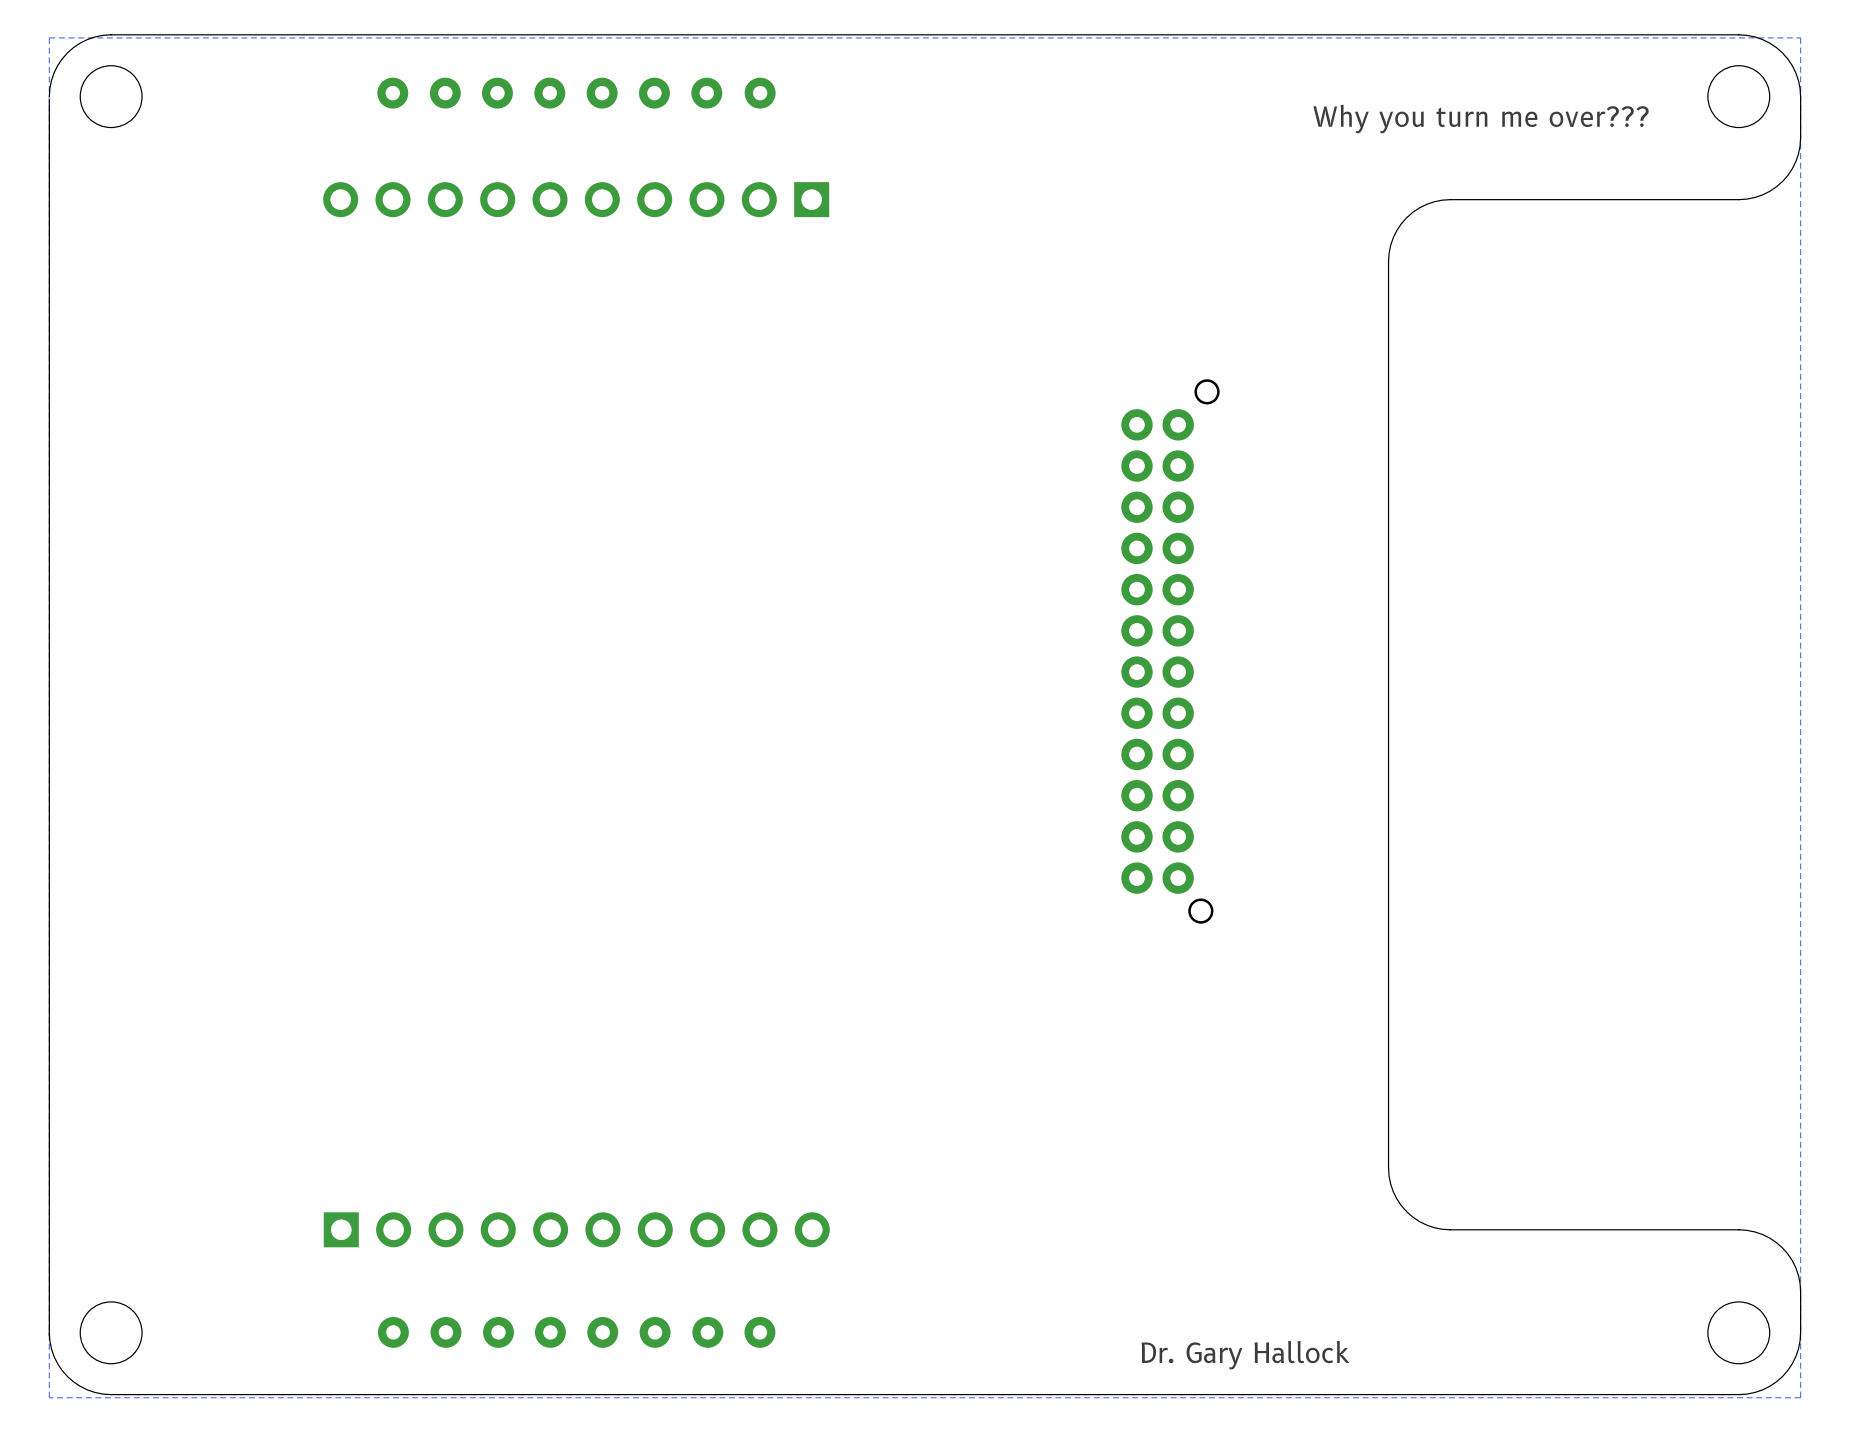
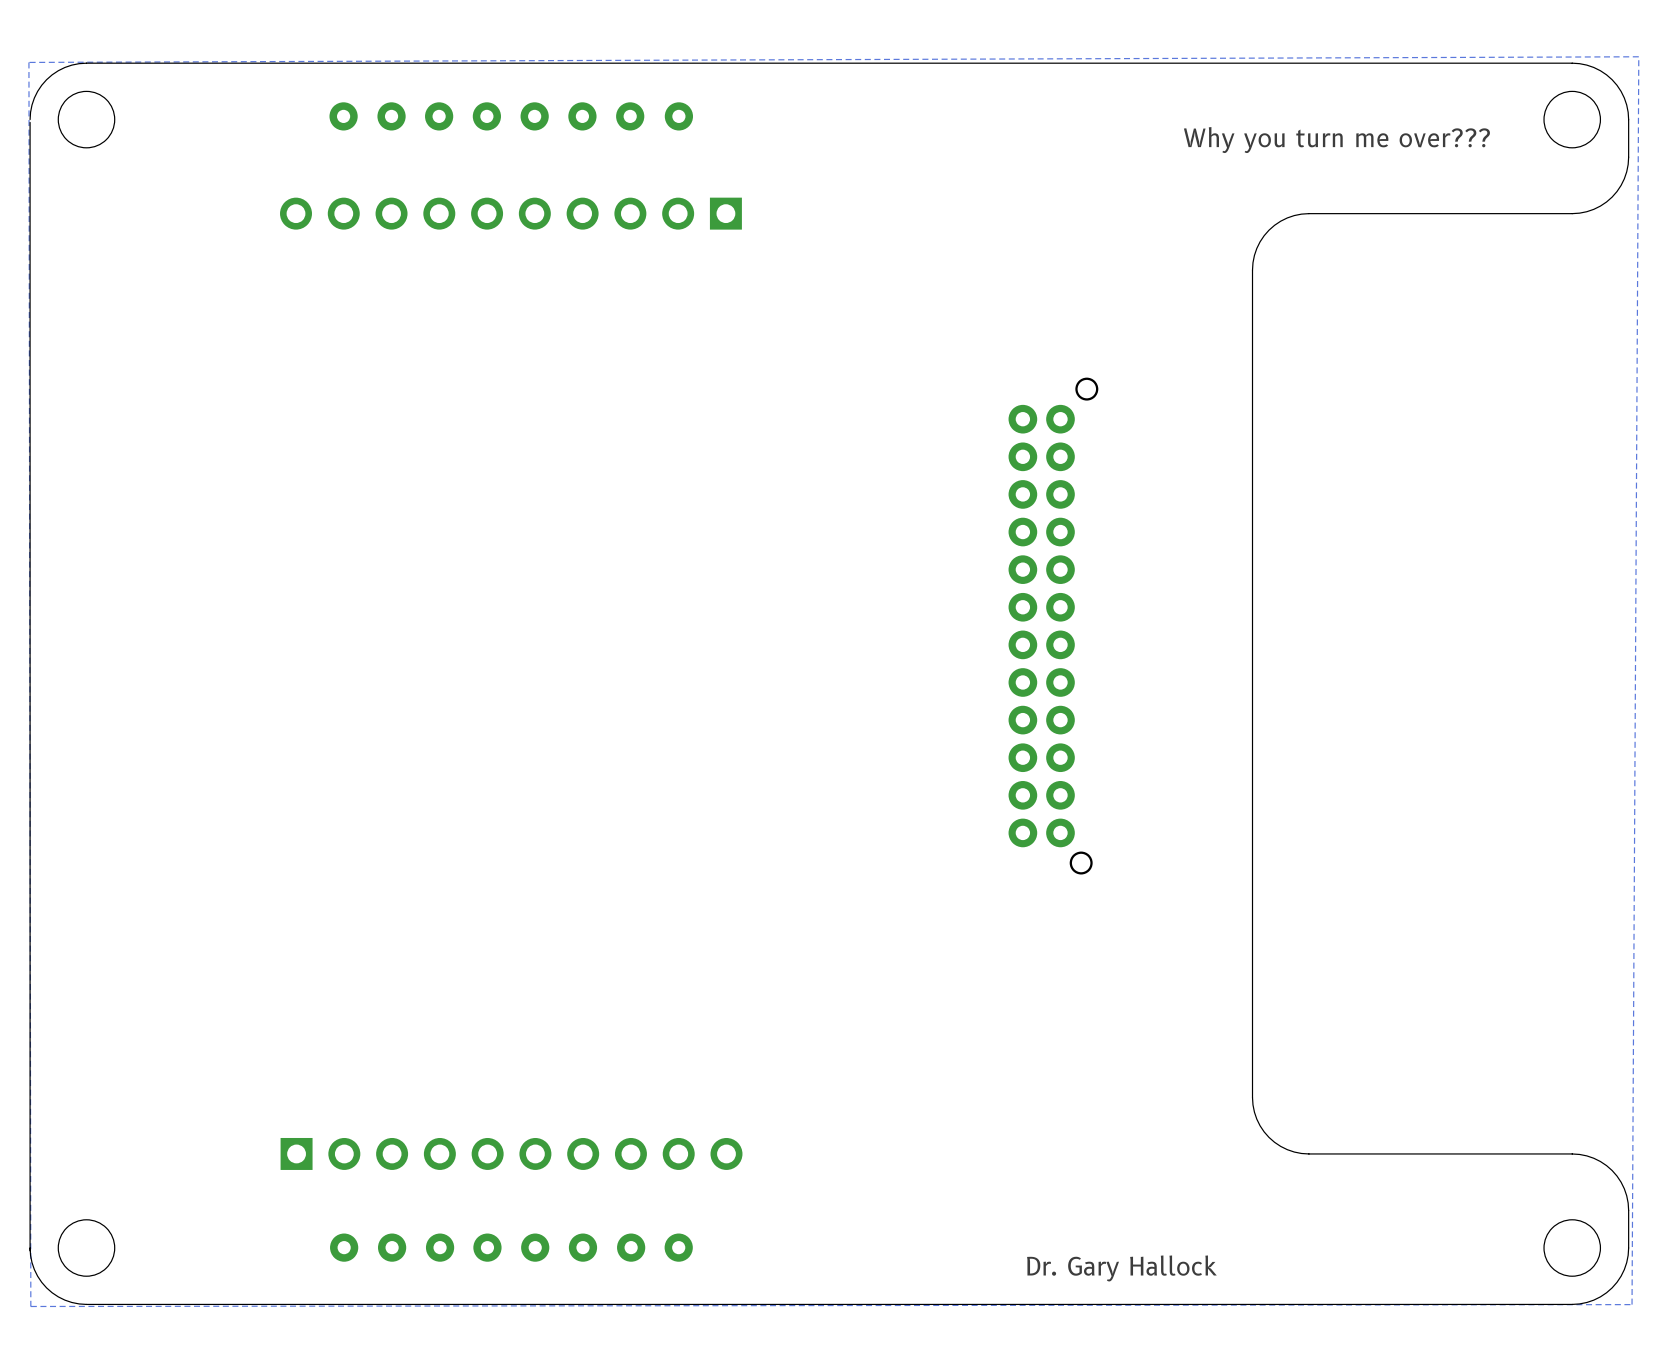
zone outline: (1800, 37) (49, 37) (49, 1397) (1800, 1397) (1800, 37) -> (1638, 56) (1632, 1304) (30, 1306) (28, 62) (1638, 56)

